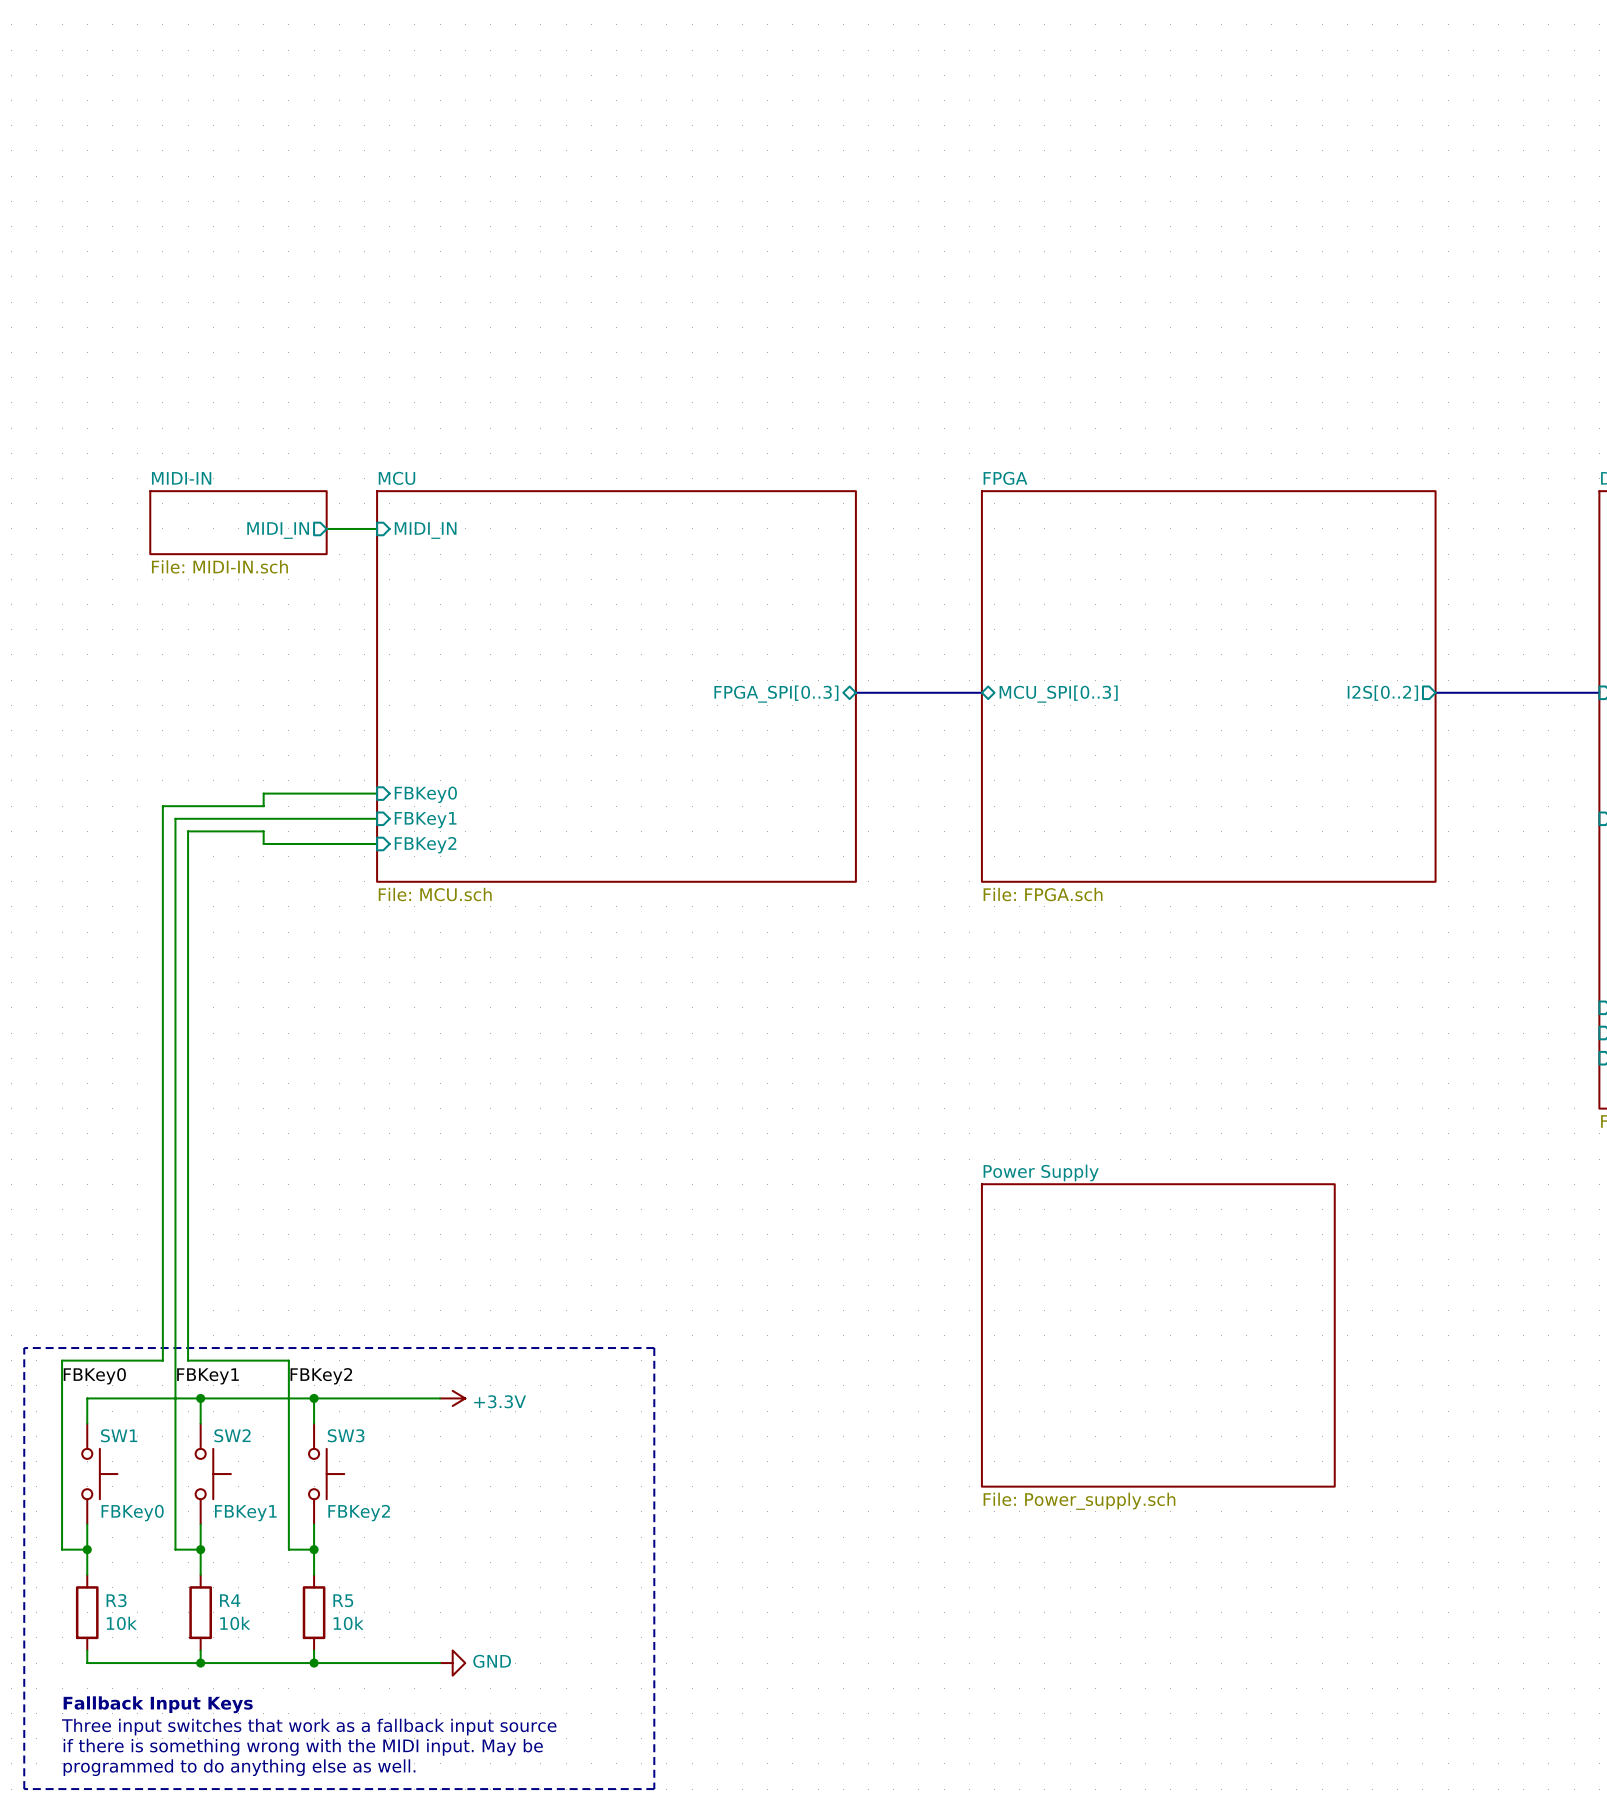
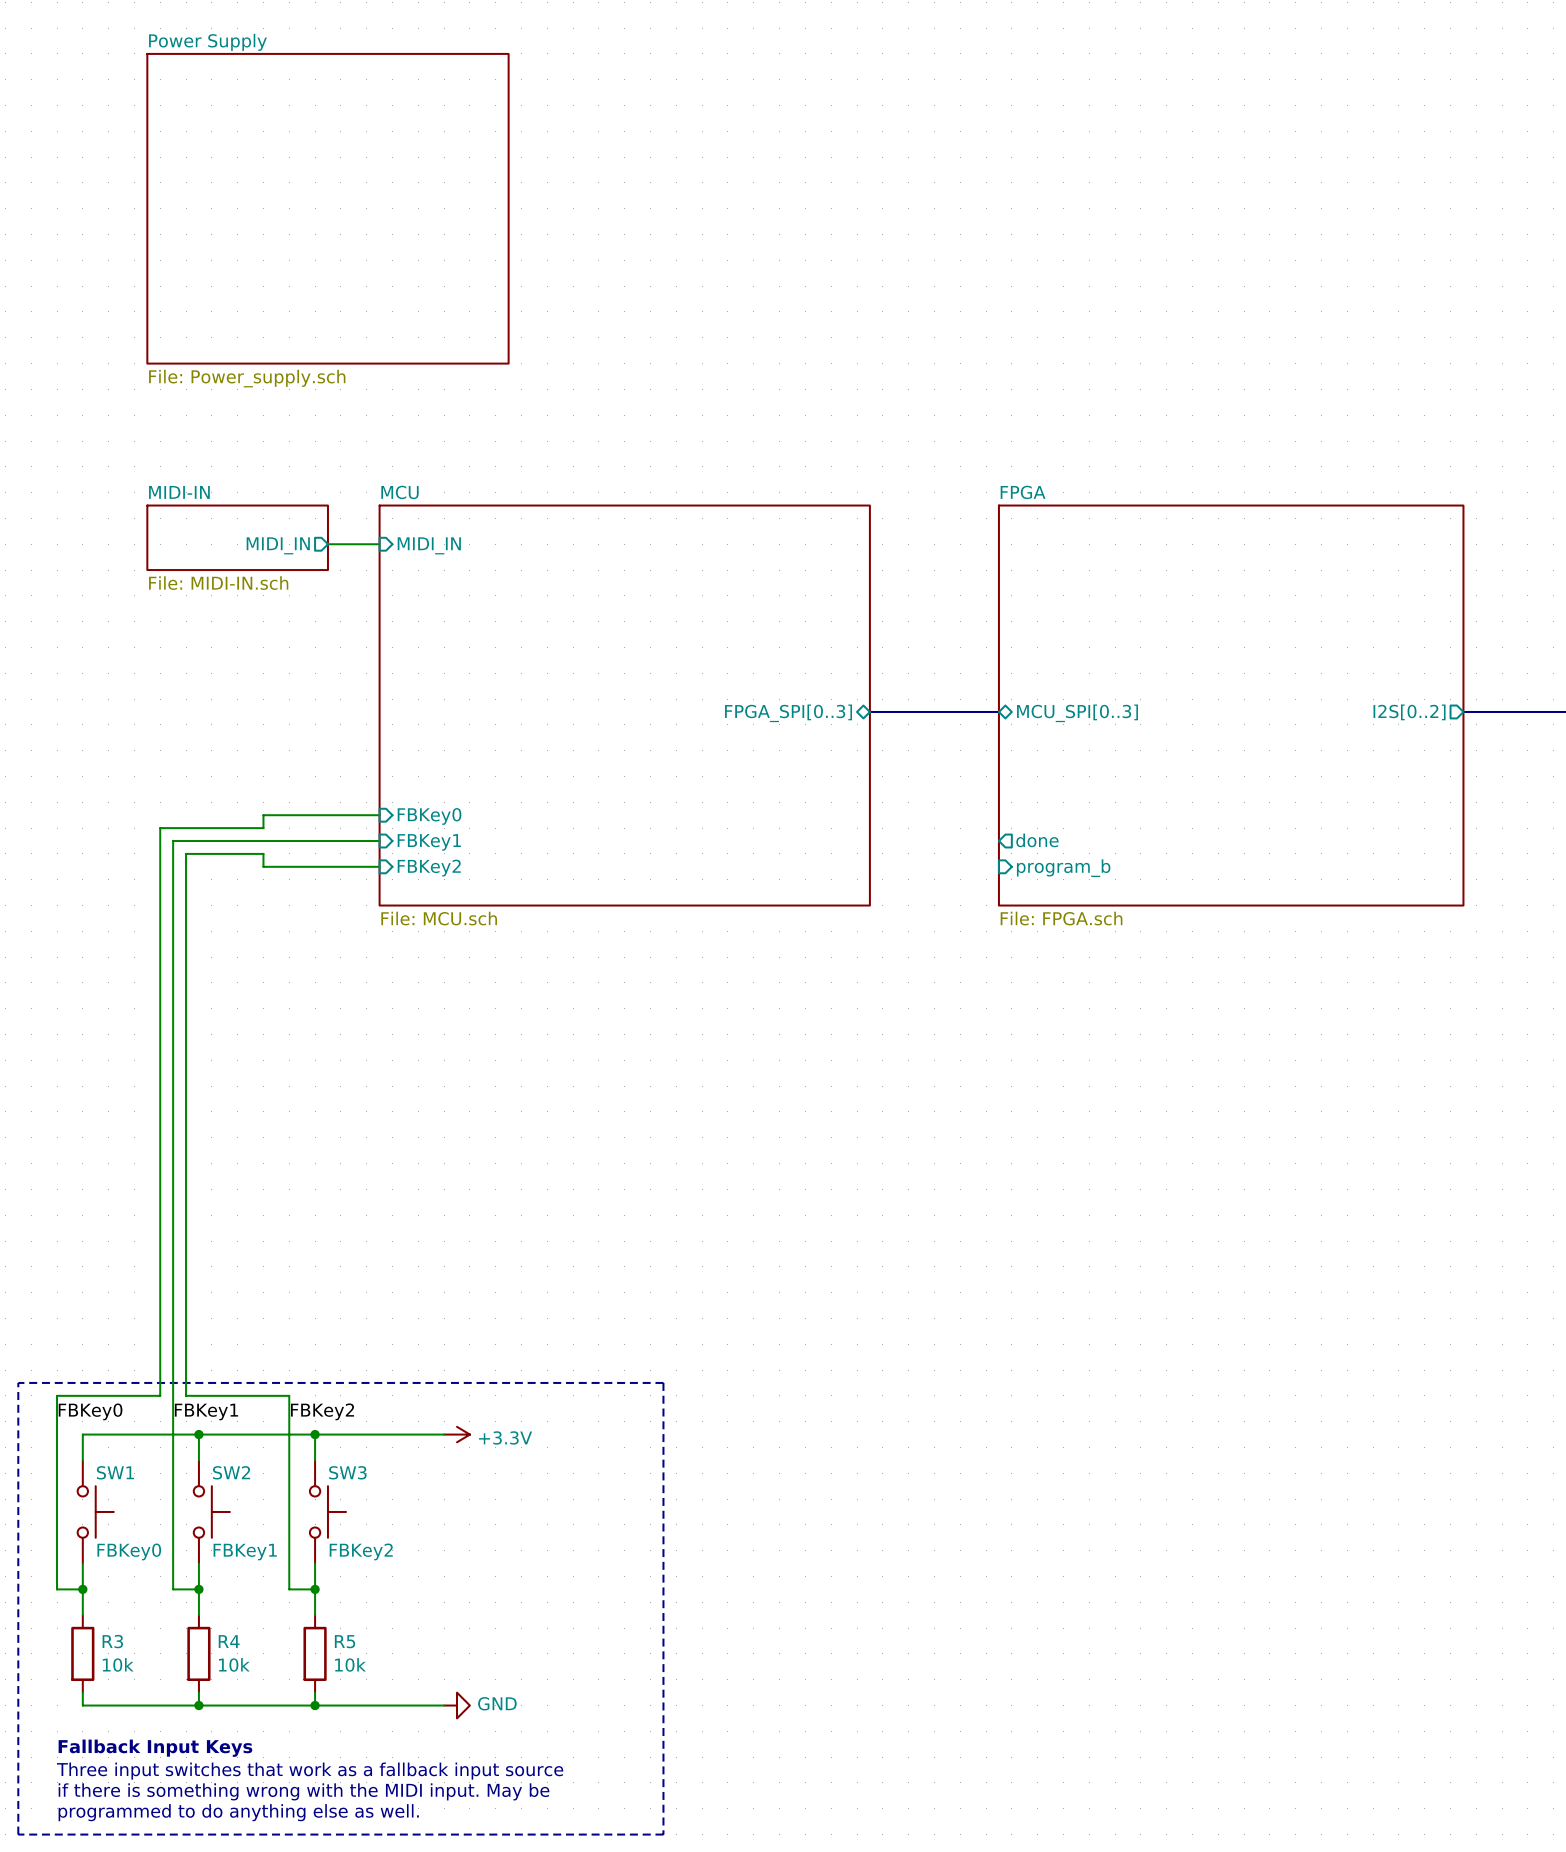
sheet Power Supply: none -> File: Power_supply.sch (327, 208)
sheet pin: none -> done (1037, 840)
sheet pin: none -> program_b (1063, 868)
sheet Power Supply: File: Power_supply.sch (1158, 1335) -> none

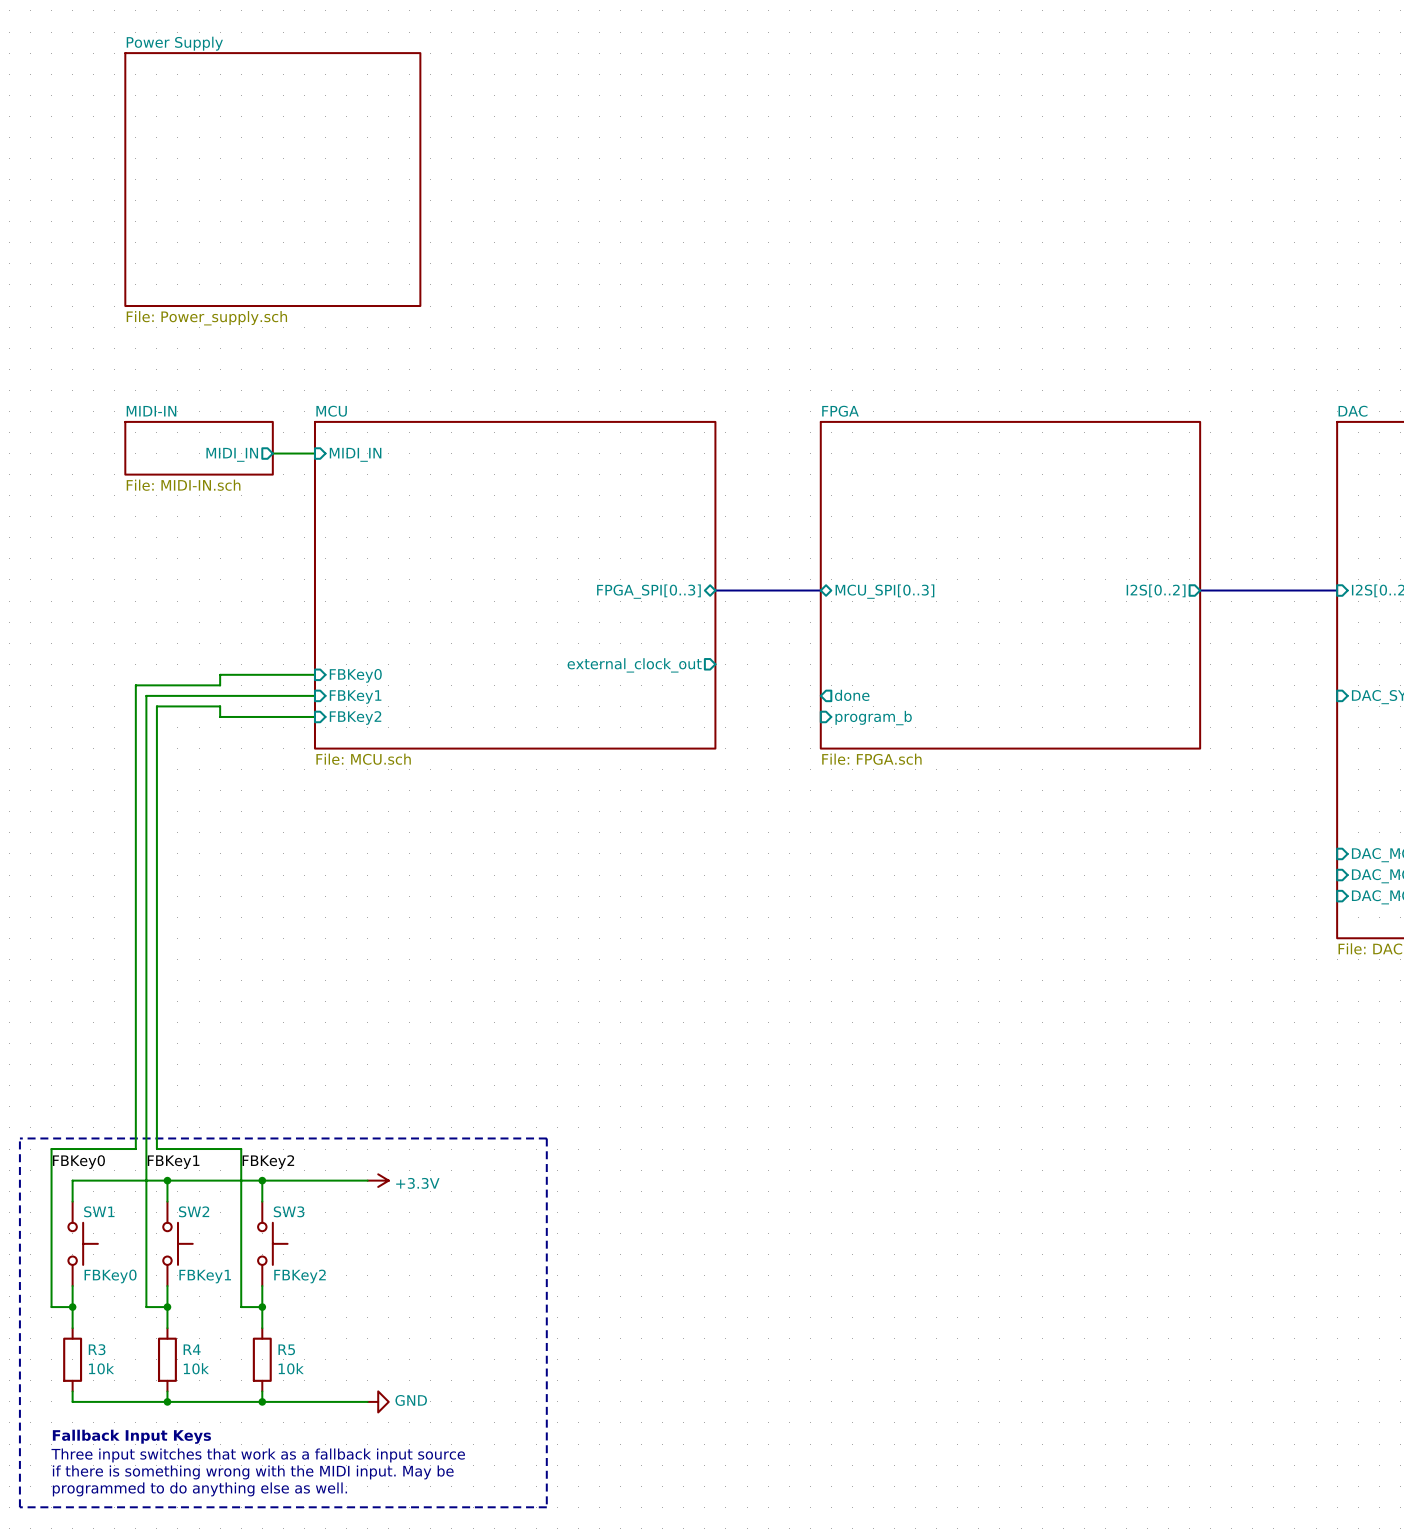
sheet pin: none -> external_clock_out (634, 665)

